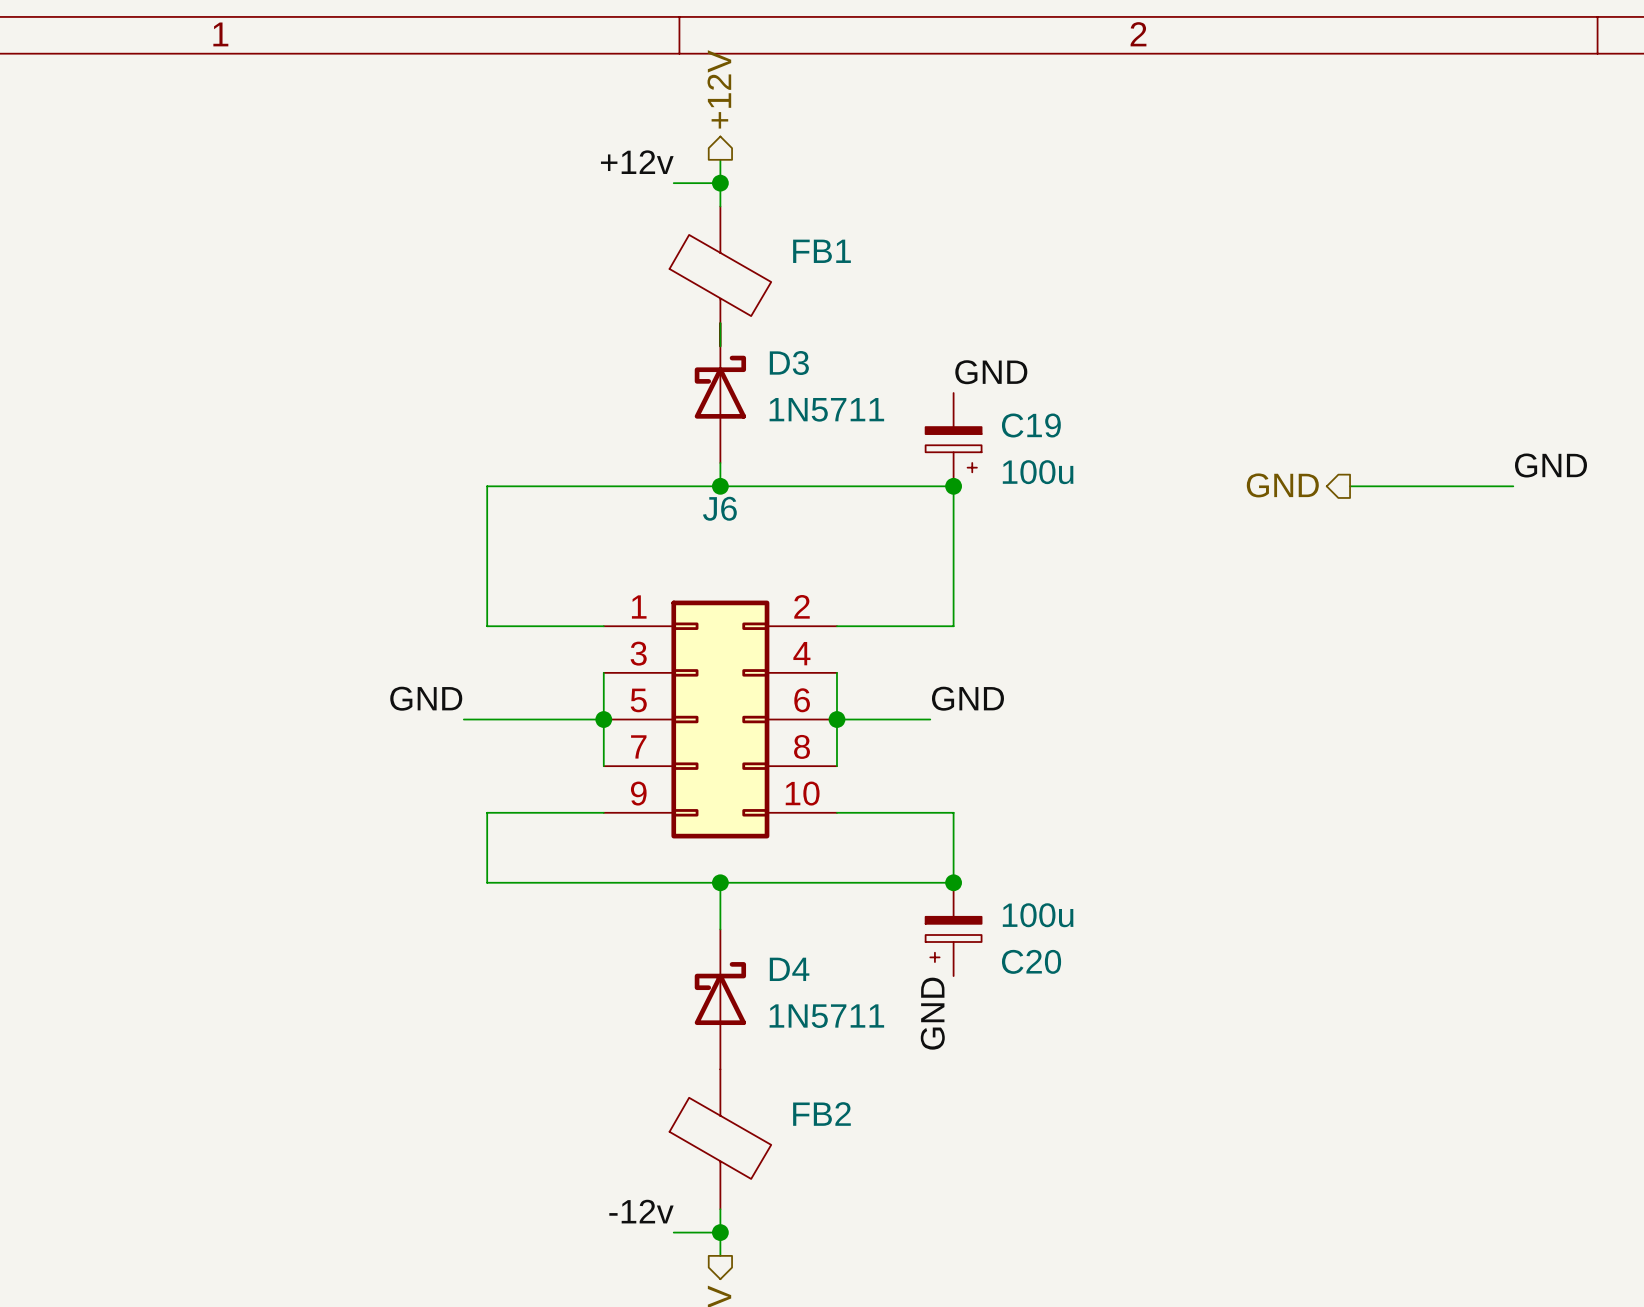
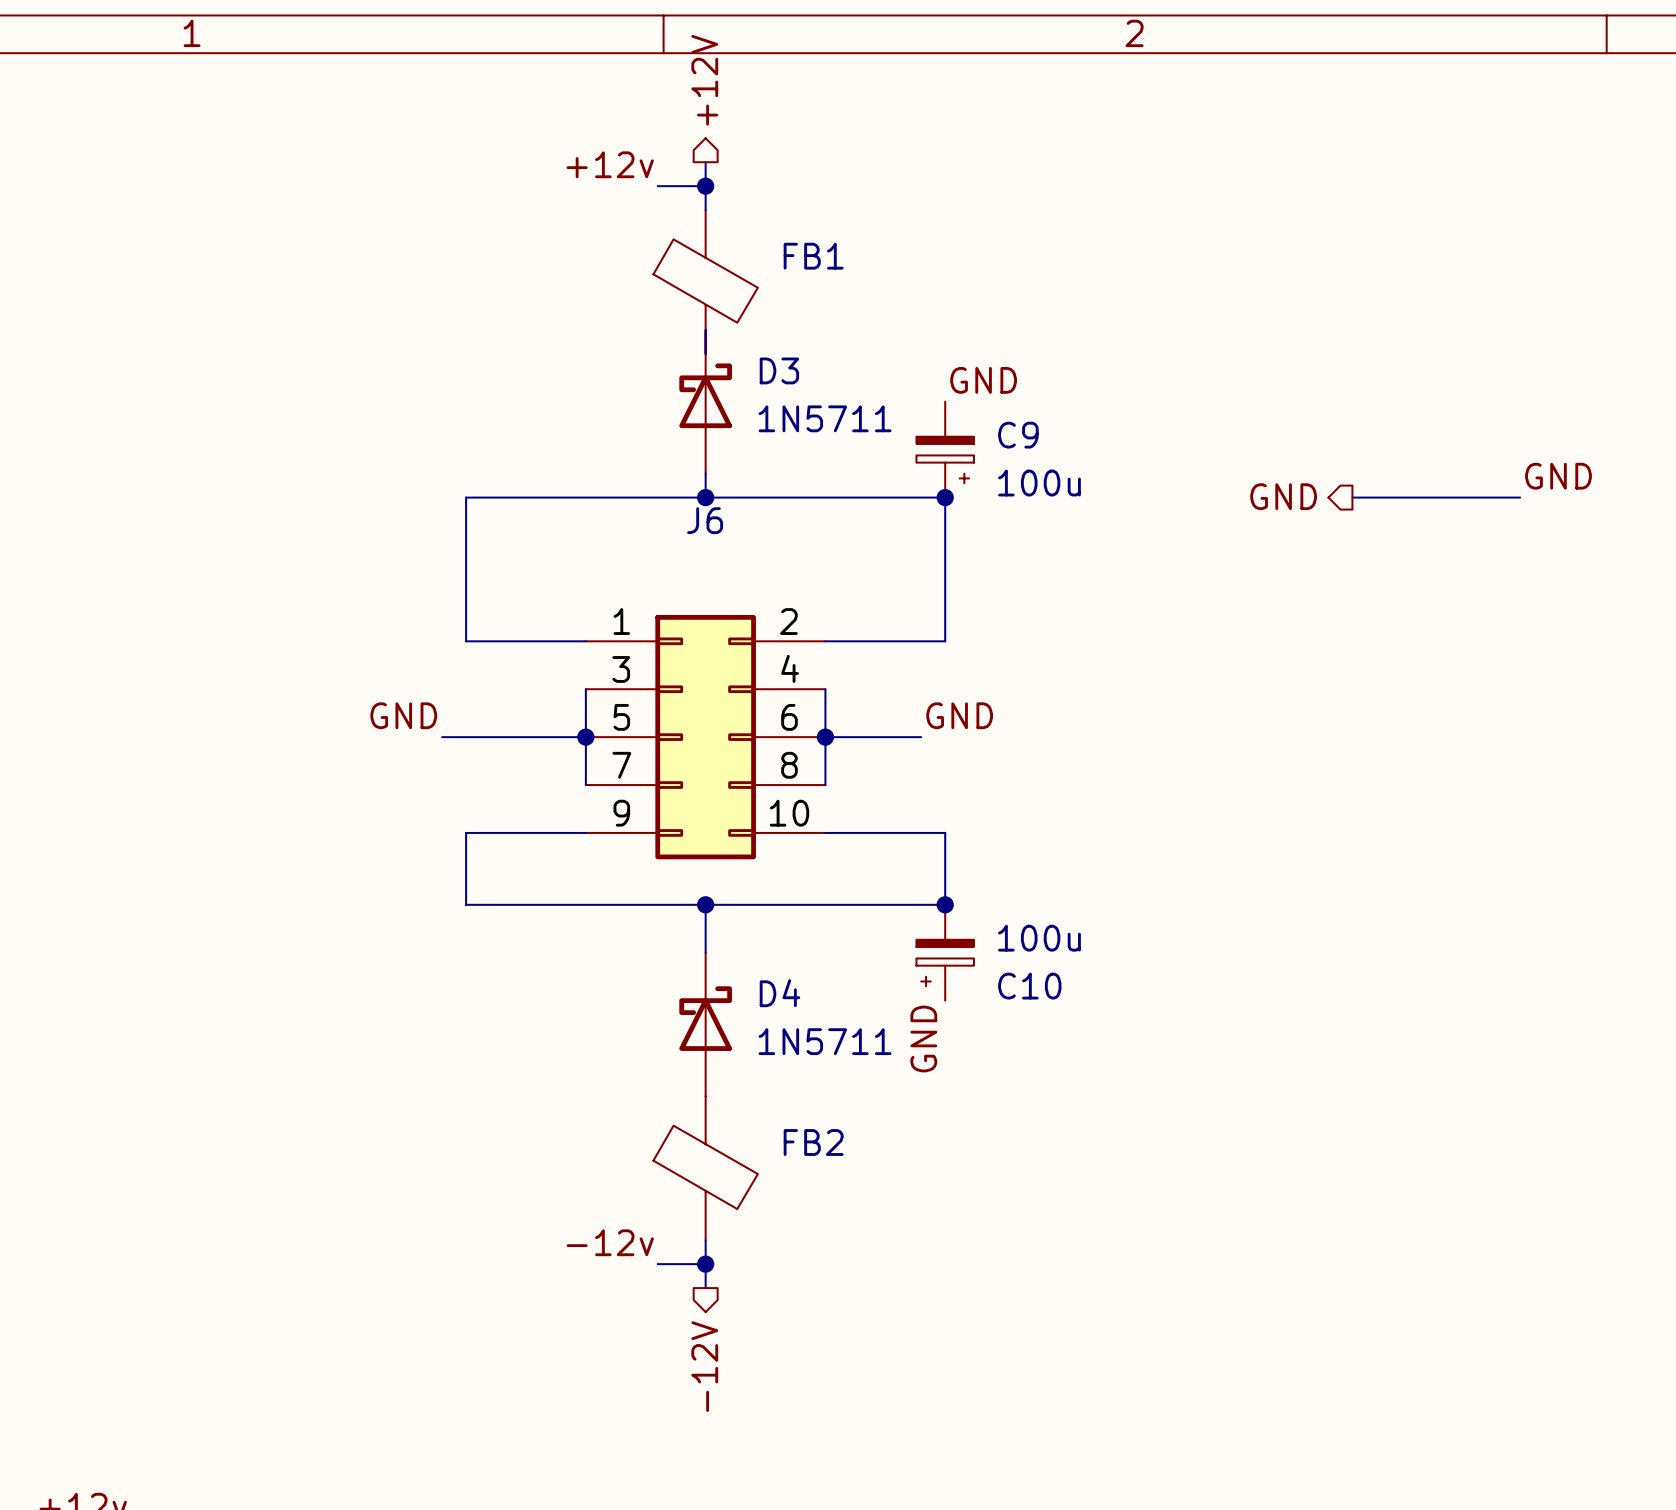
C19 name: C19 (1031, 425) -> C9 (1018, 435)
C20 name: C20 (1031, 961) -> C10 (1029, 986)

